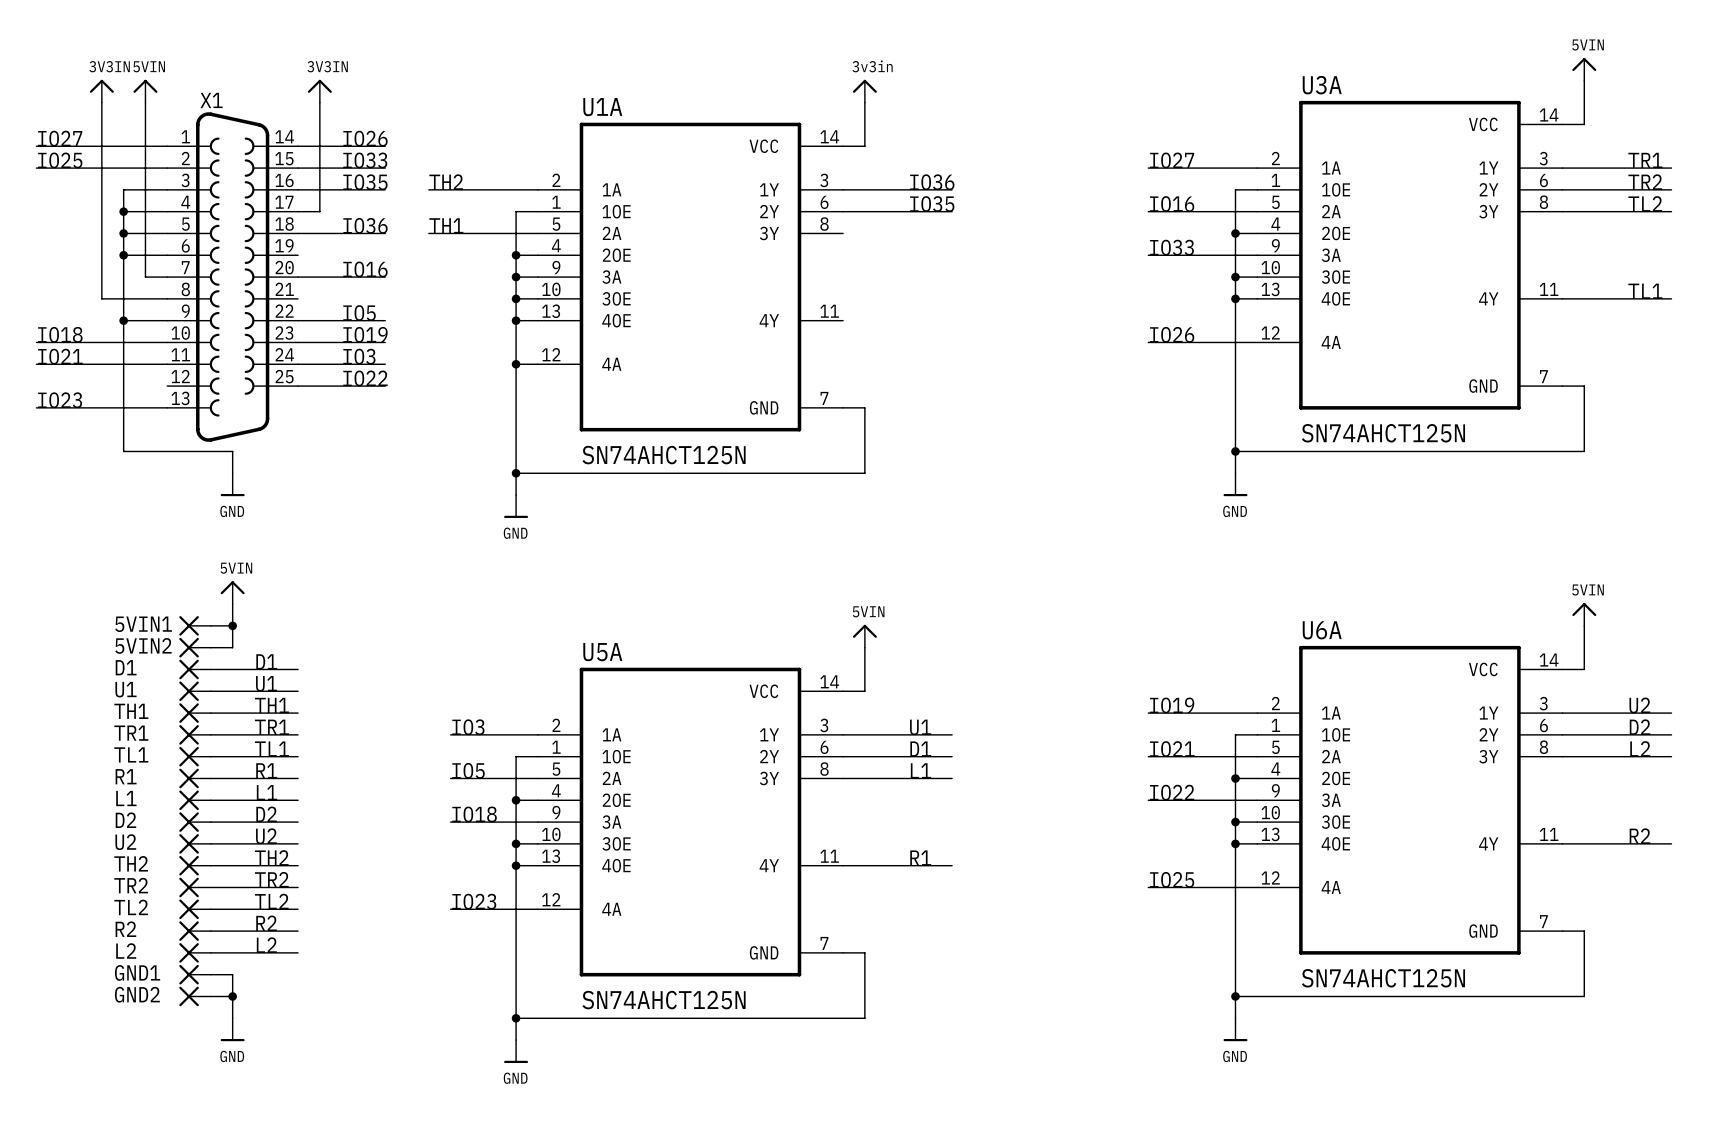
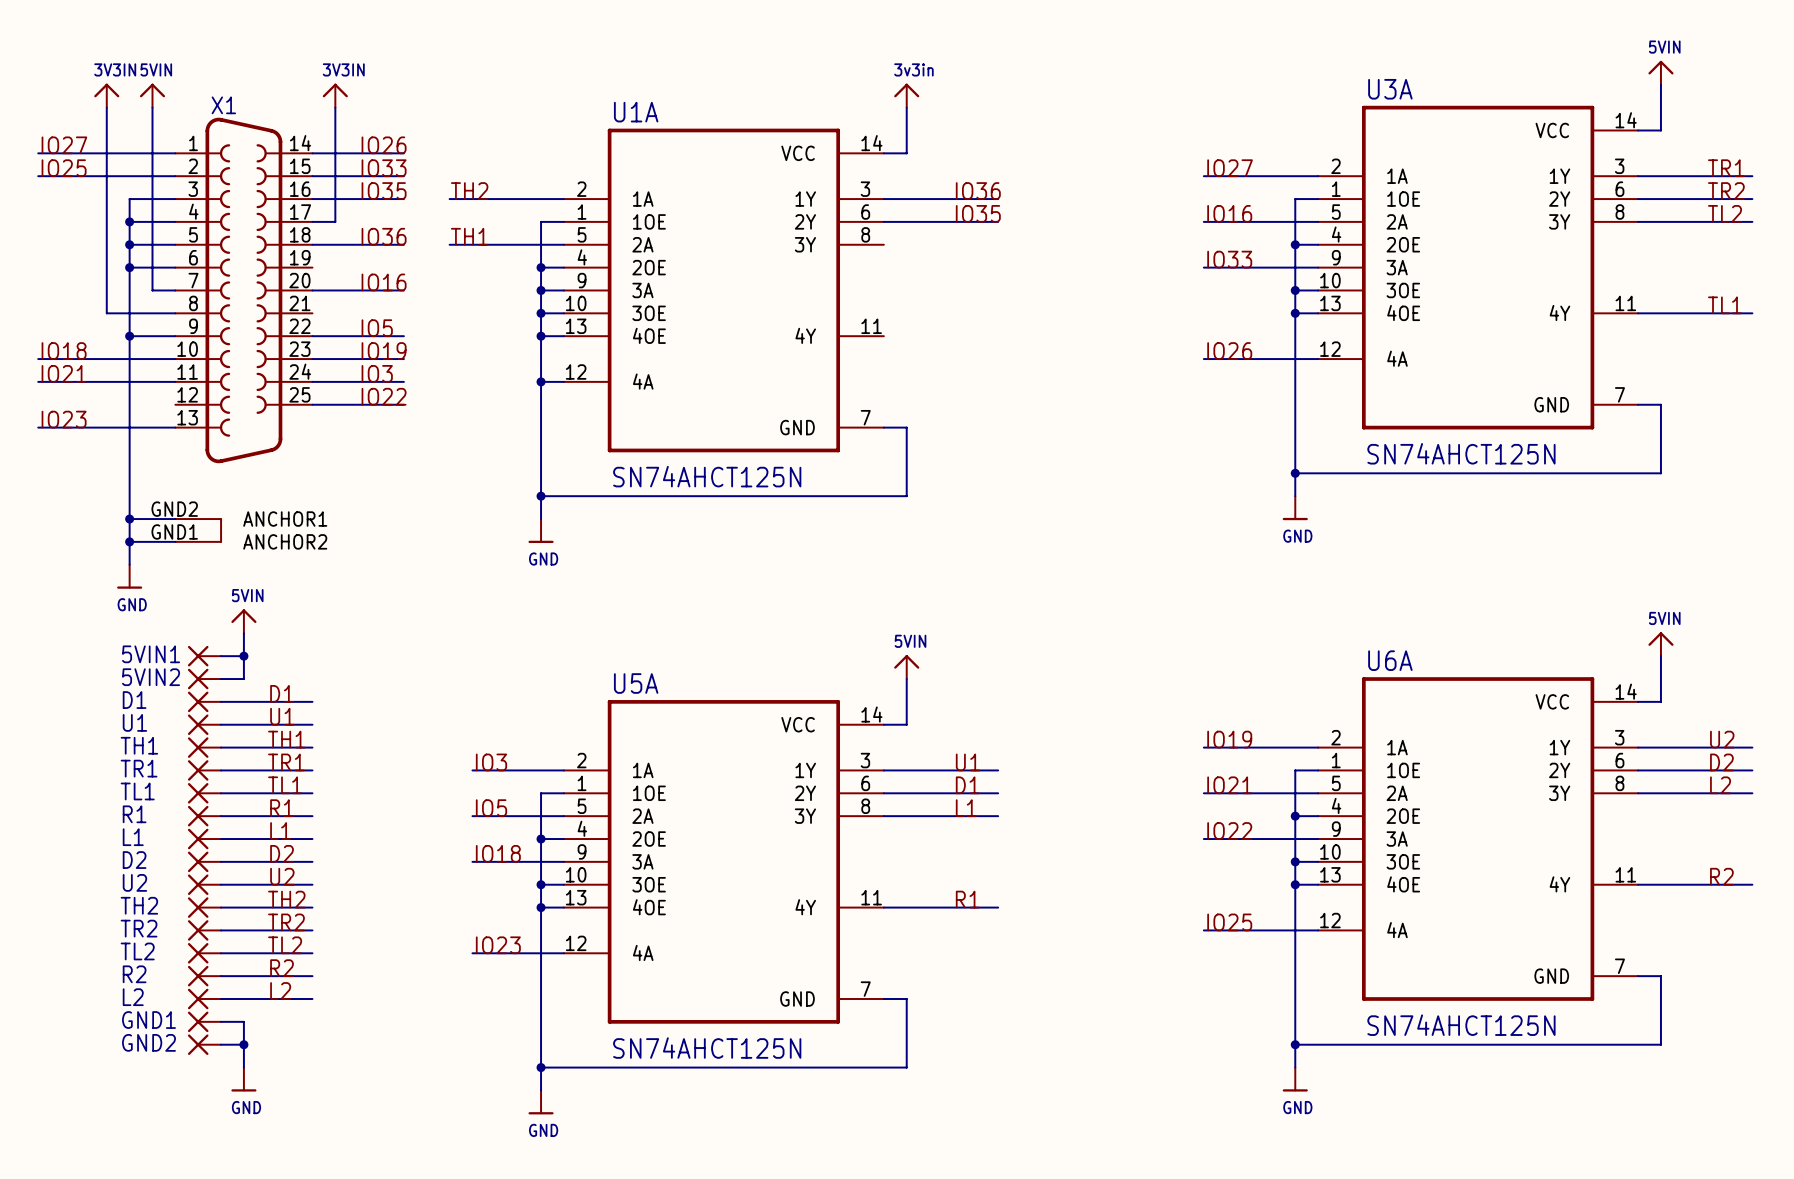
X1 symbol: [167, 112, 299, 442] -> [175, 117, 313, 543]
wire: (123, 451) (232, 451) (232, 473) -> (129, 473) (129, 564)
power symbol position: GND (232, 484) -> GND (129, 576)
wire: none -> (129, 519) (175, 519)
junction: none -> (129, 519)
wire: none -> (129, 541) (175, 541)
junction: none -> (129, 541)

